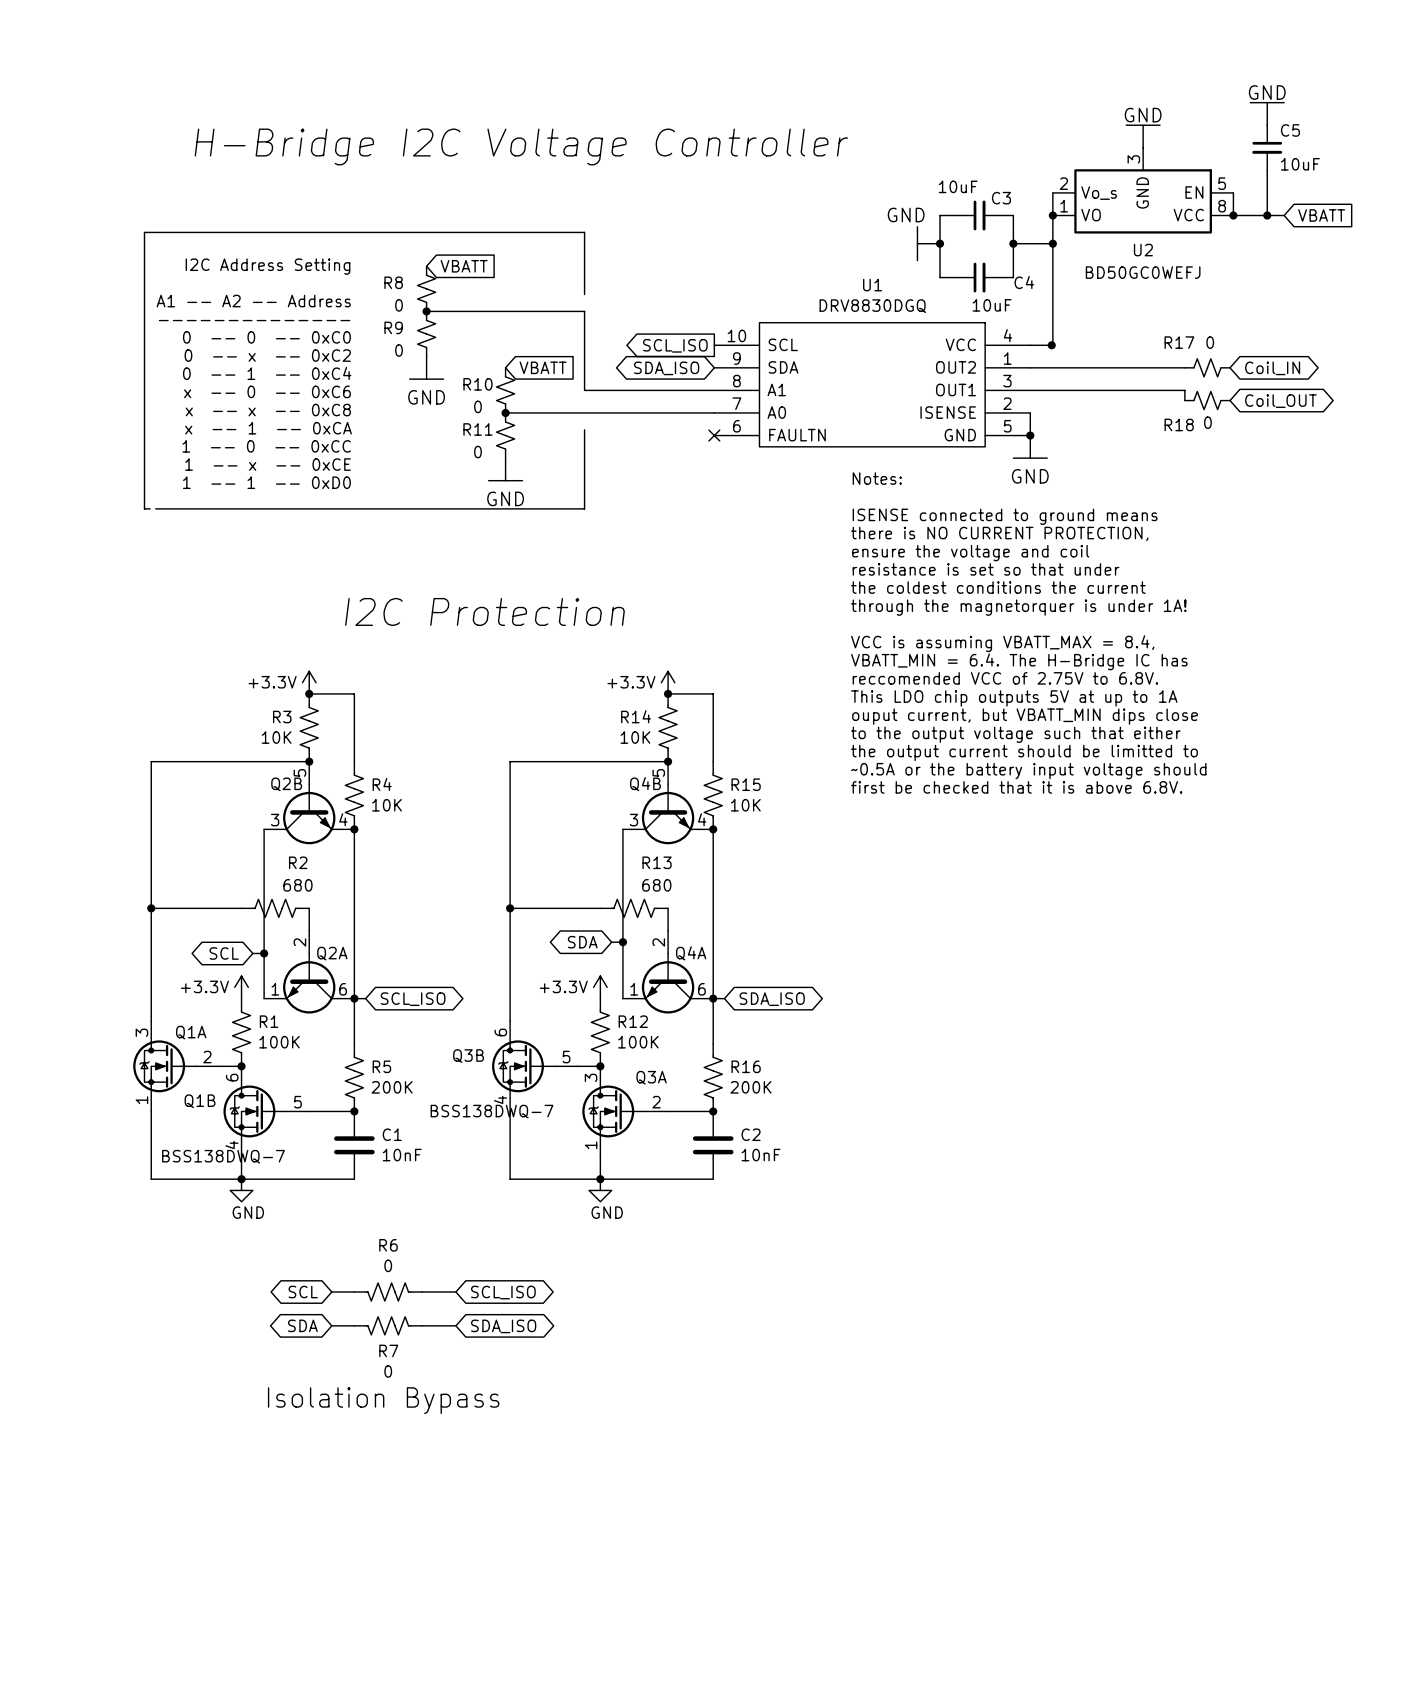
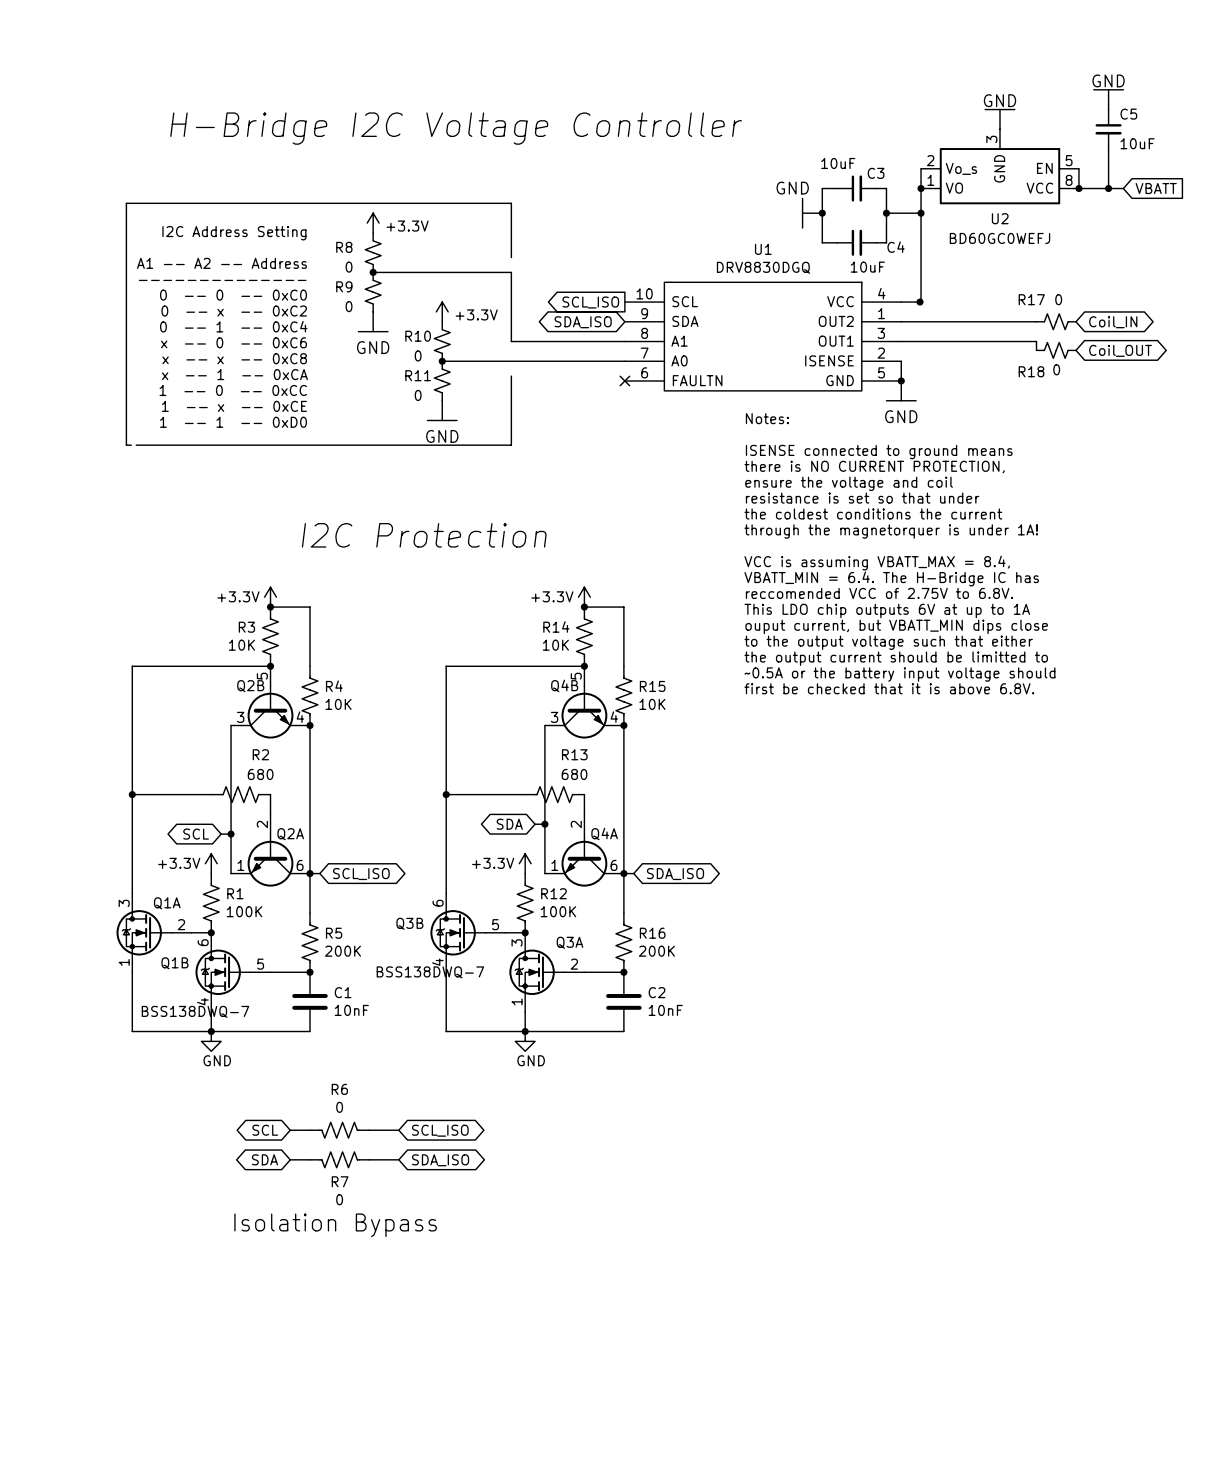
power symbol: none -> +3.3V (373, 223)
global label: VBATT (464, 266) -> none
U2 value: BD50GC0WEFJ (1143, 272) -> BD60GC0WEFJ (999, 238)
power symbol: none -> +3.3V (442, 311)
global label: VBATT (543, 367) -> none
text: This LDO chip outputs 5V at up to 1A (1014, 698) -> This LDO chip outputs 6V at up to 1A (887, 610)

